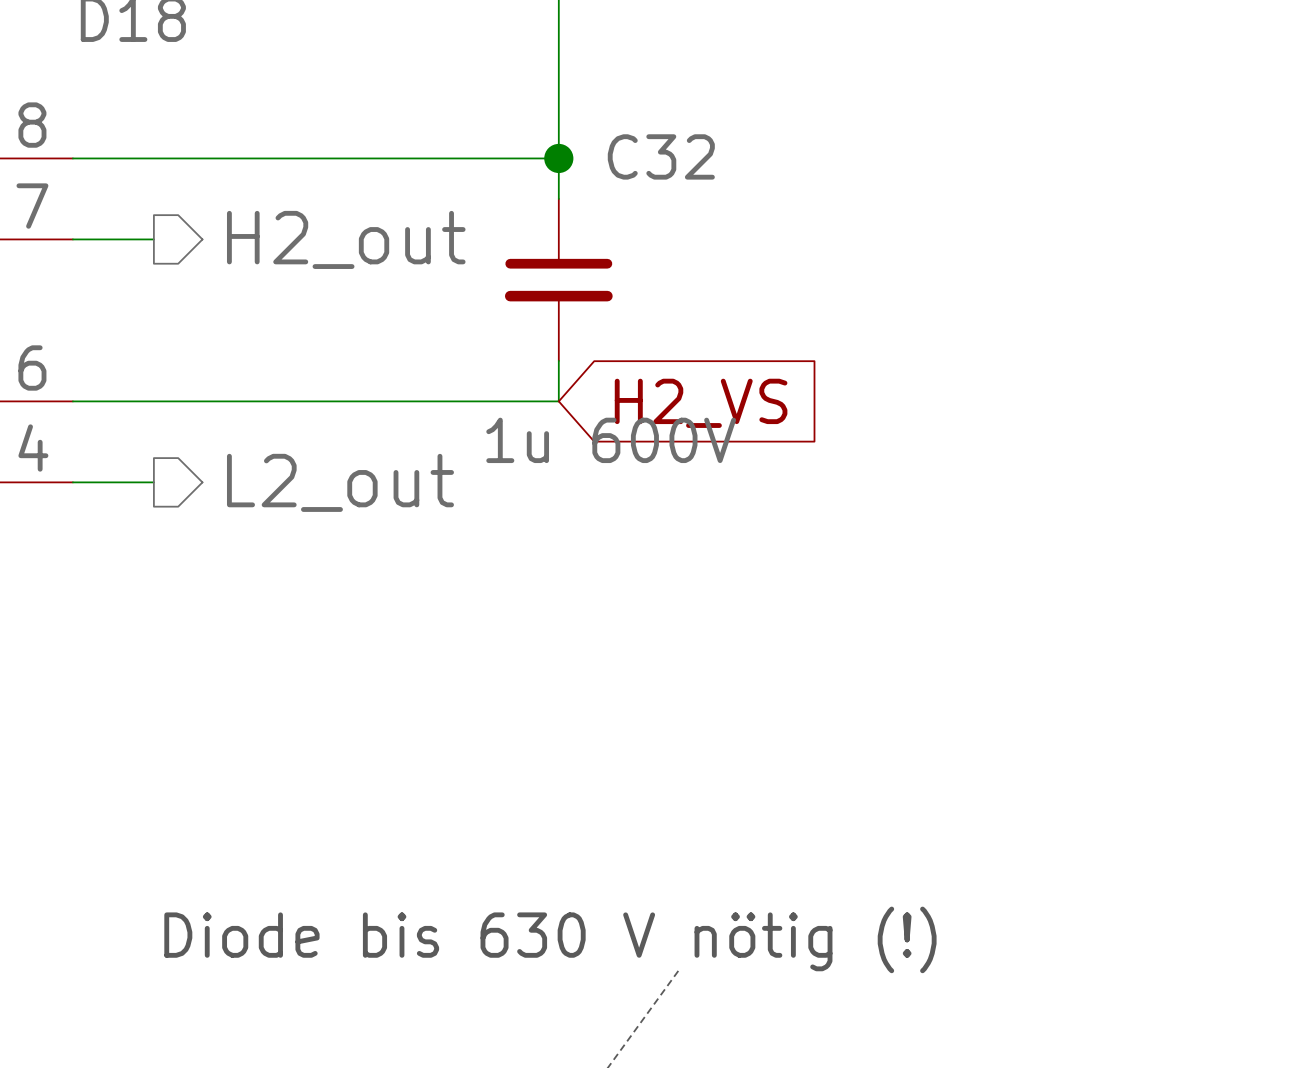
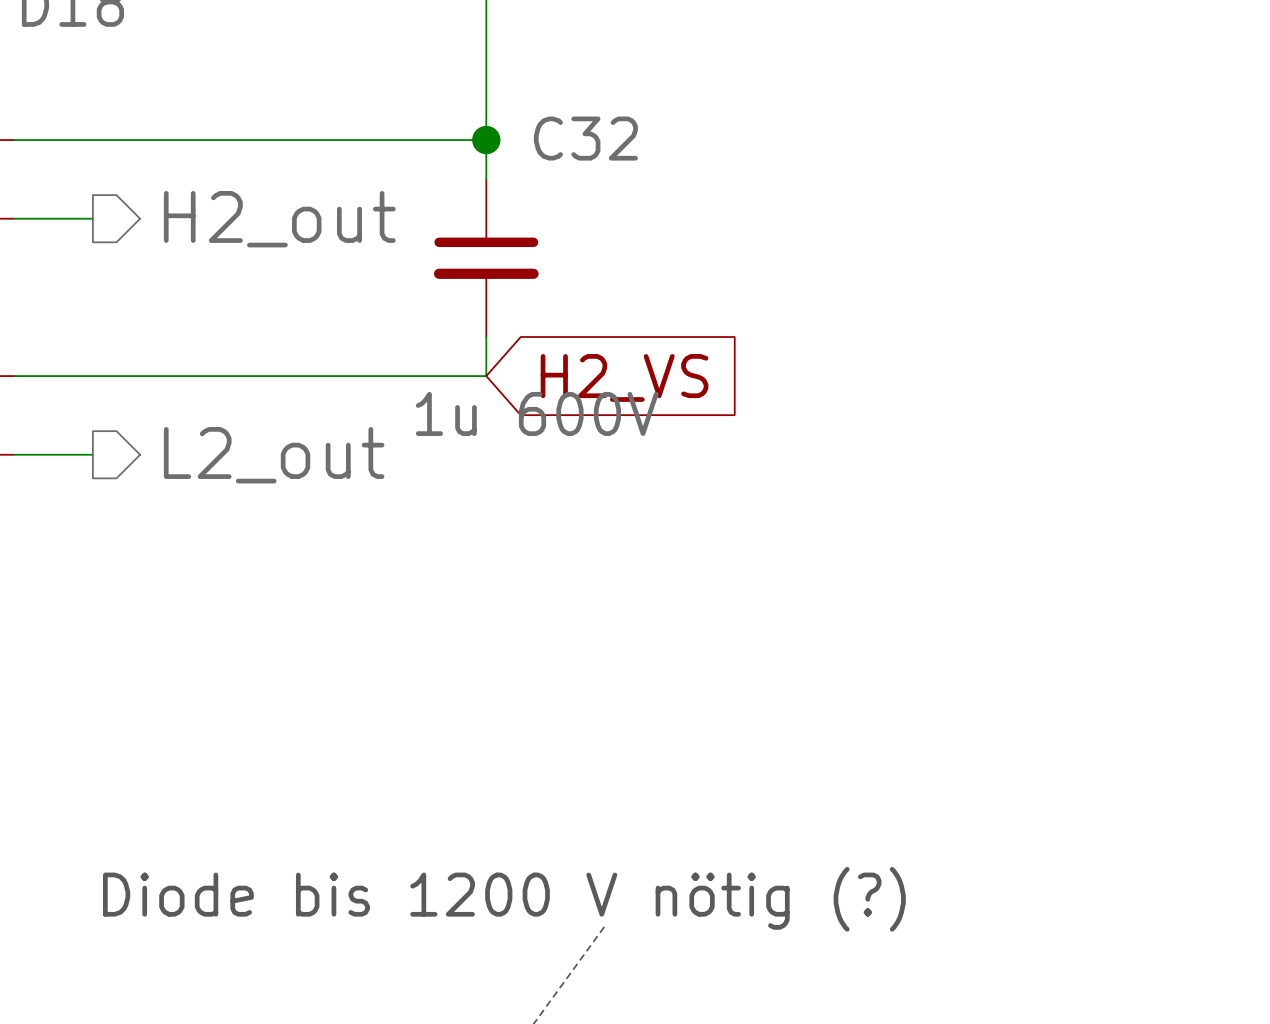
text: Diode bis 630 V nötig (!) (550, 939) -> Diode bis 1200 V nötig (?) (504, 899)

